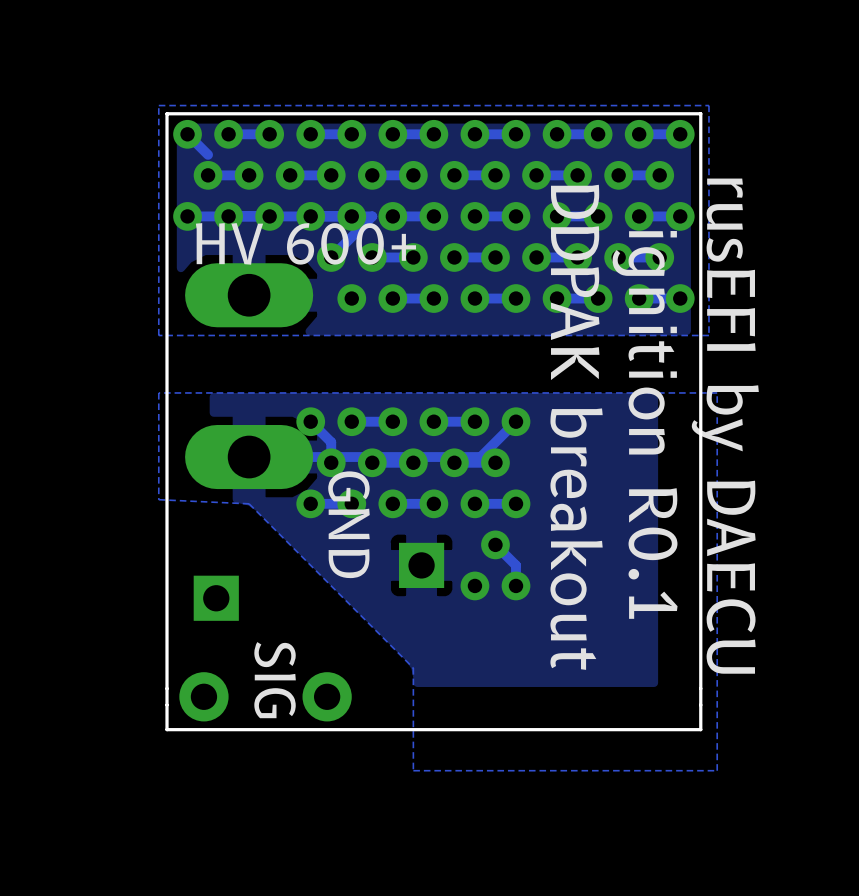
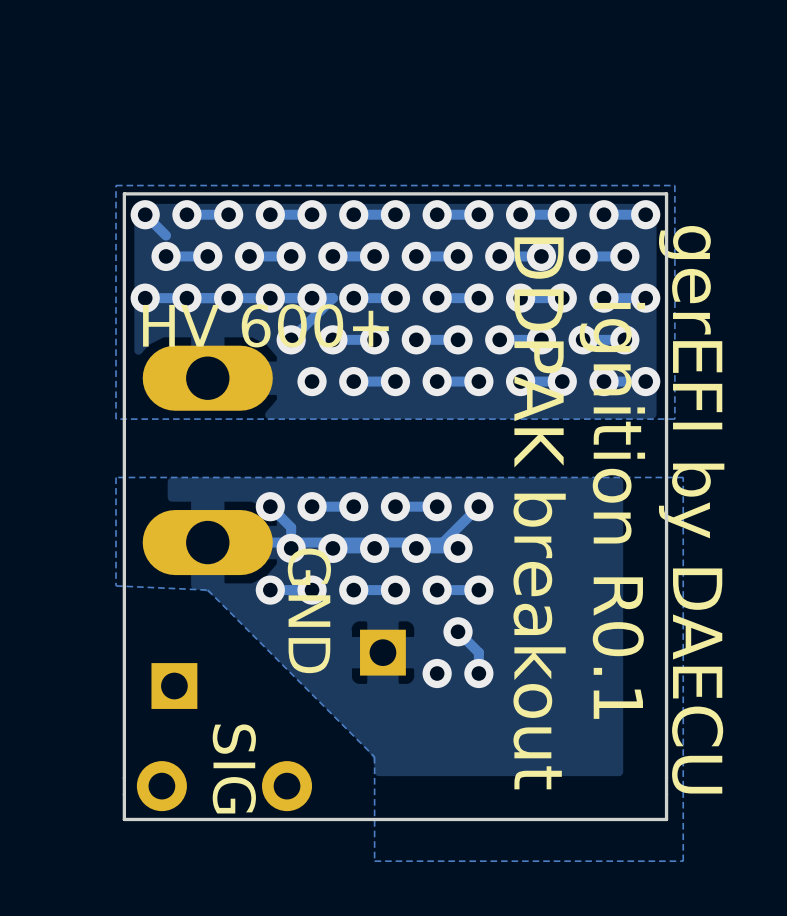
text: rusEFI by DAECU (725, 426) -> gerEFI by DAECU (691, 509)

